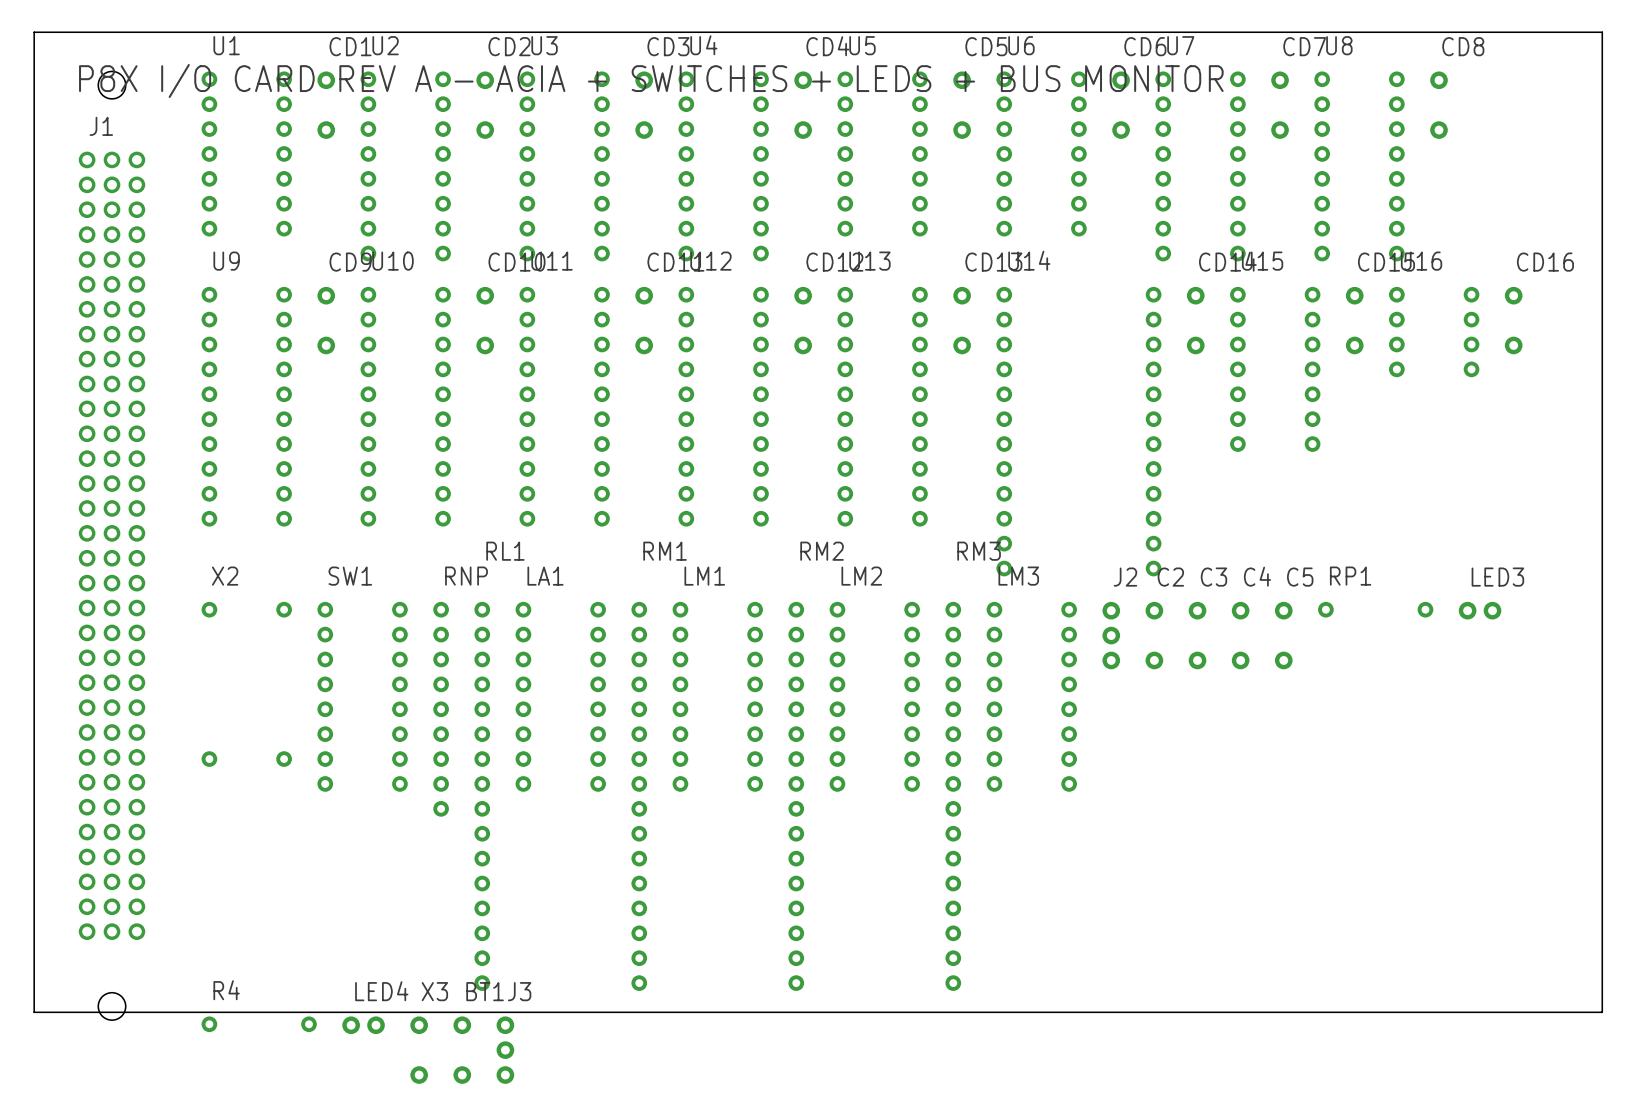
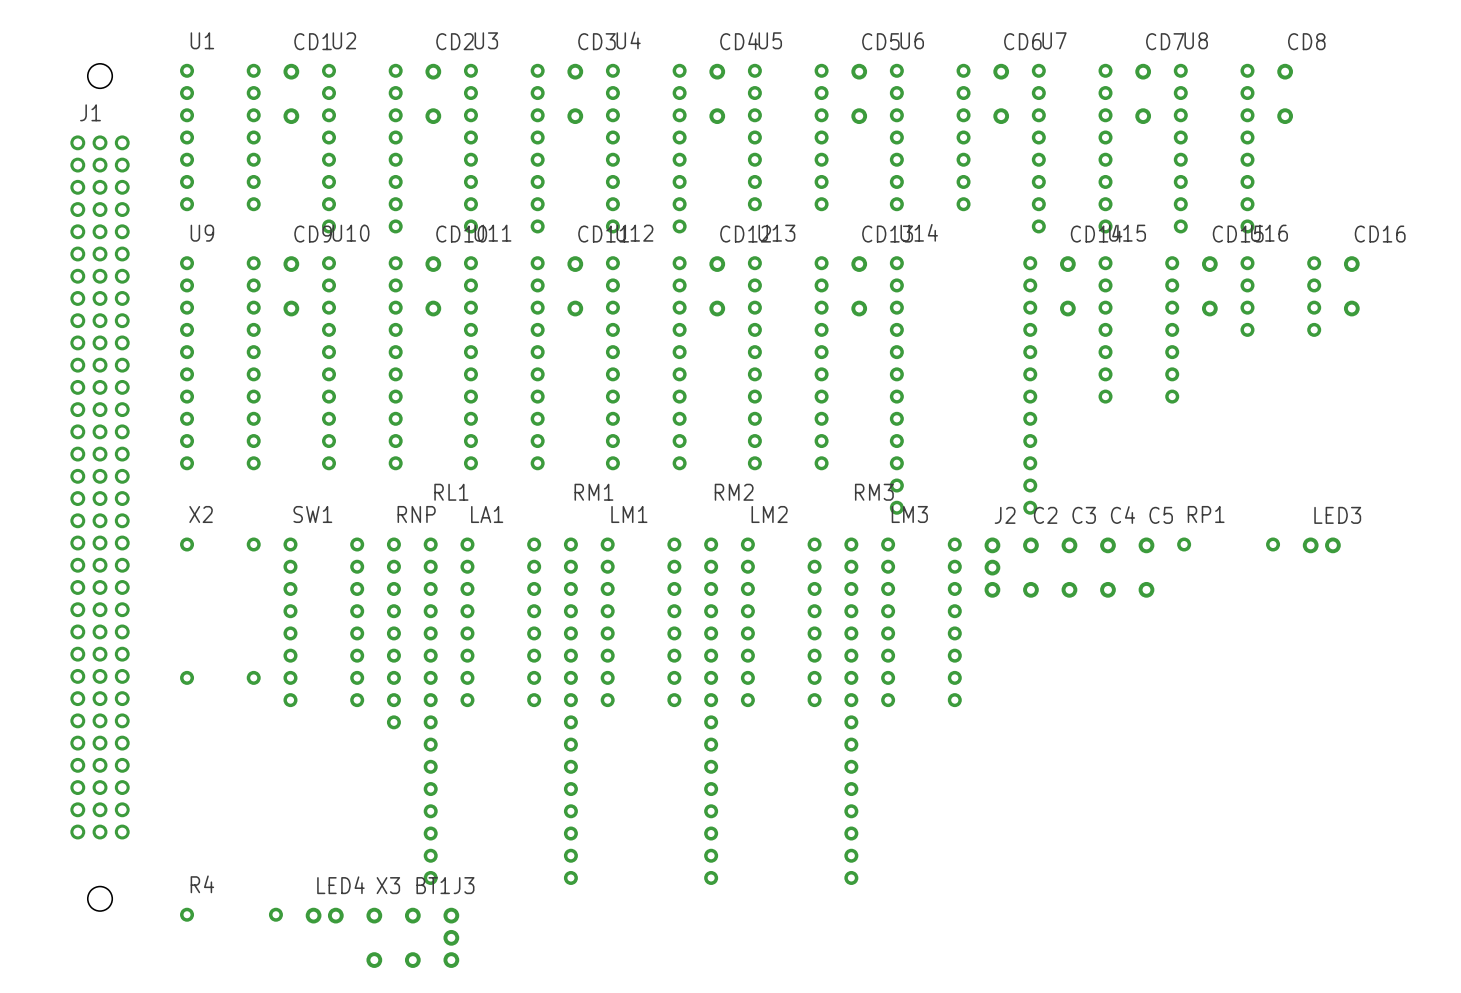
board edge: (34, 32) (1602, 32) (1602, 1012) (34, 1012) (34, 32) -> none
text: P8X I/O CARD REV A - ACIA + SWITCHES + LEDS + BUS MONITOR (651, 80) -> none

